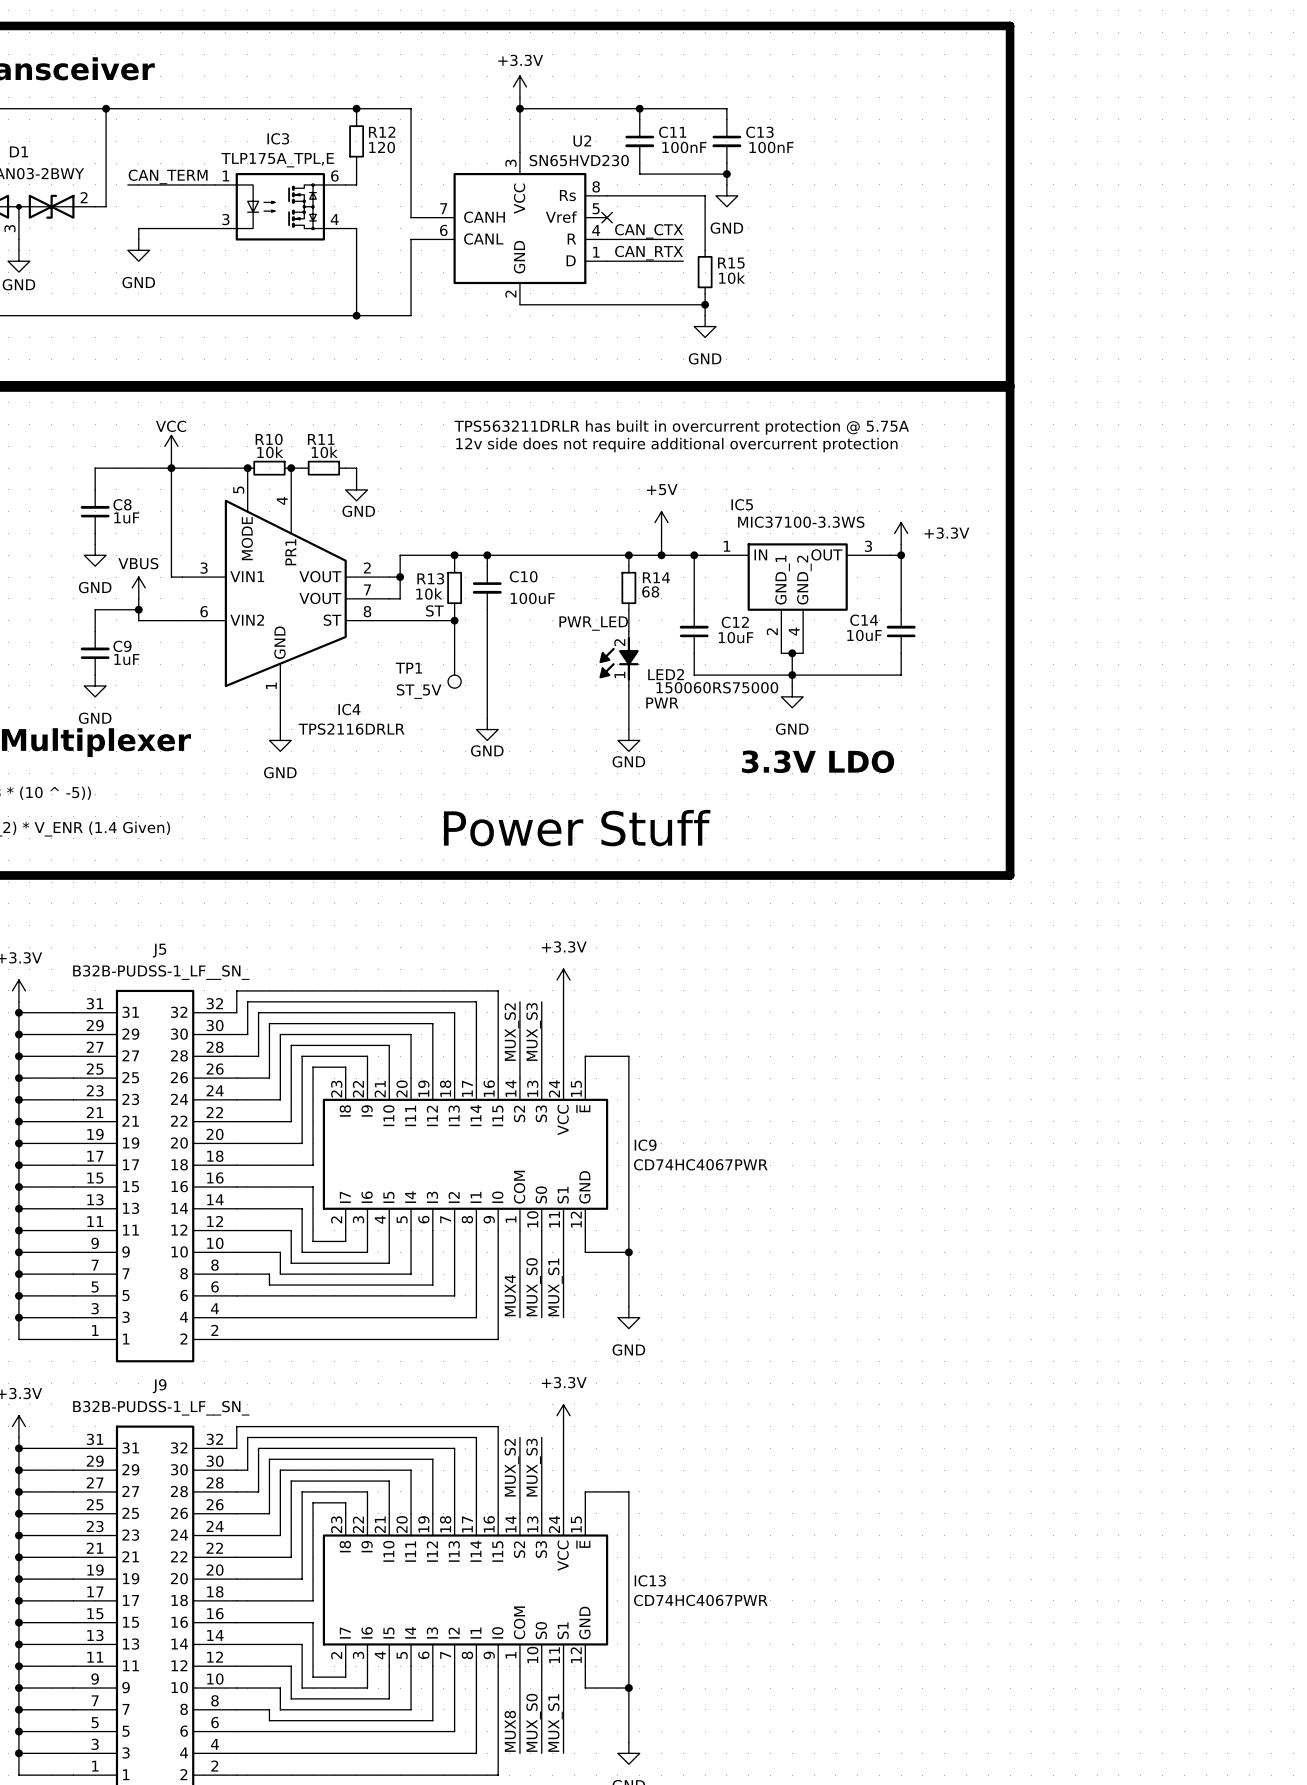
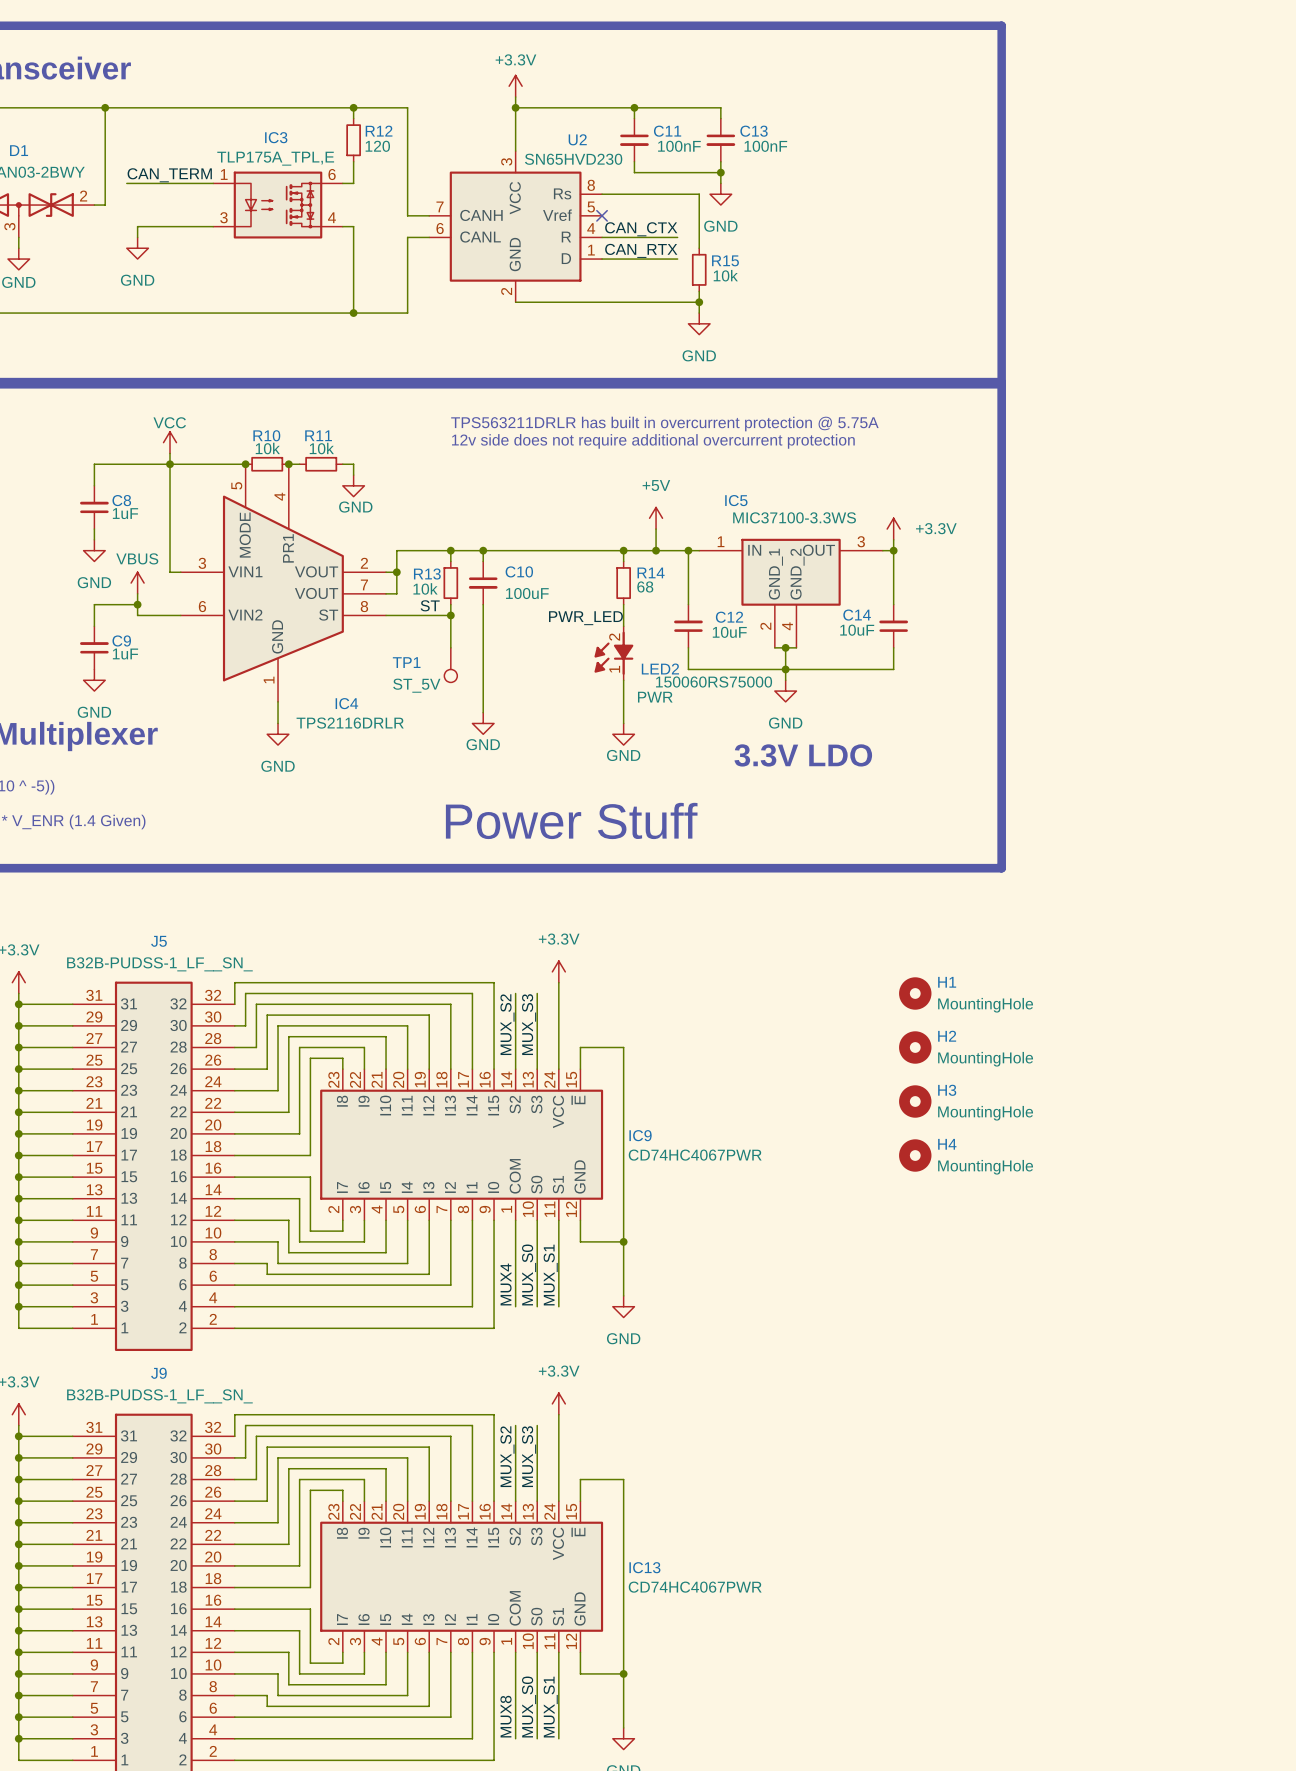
H1: none -> MountingHole (915, 993)
H2: none -> MountingHole (915, 1047)
H3: none -> MountingHole (915, 1101)
H4: none -> MountingHole (915, 1155)

